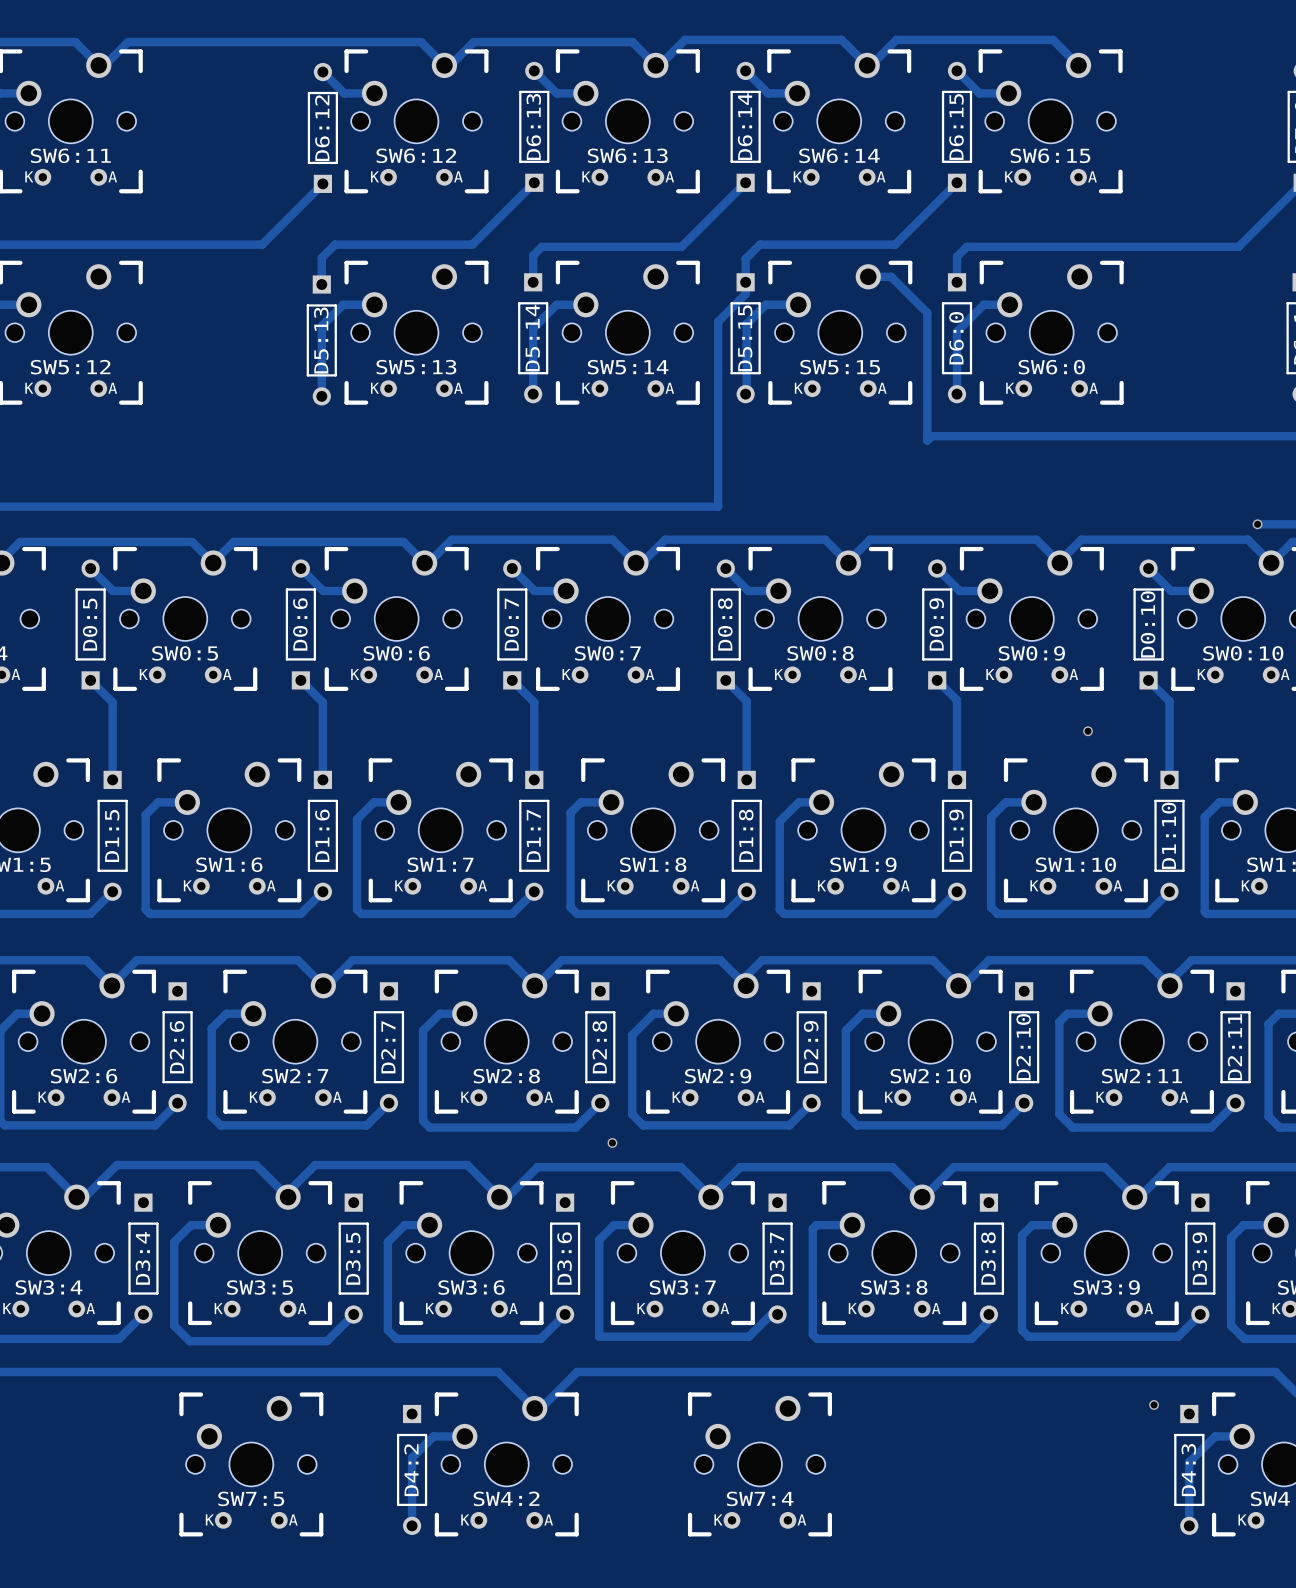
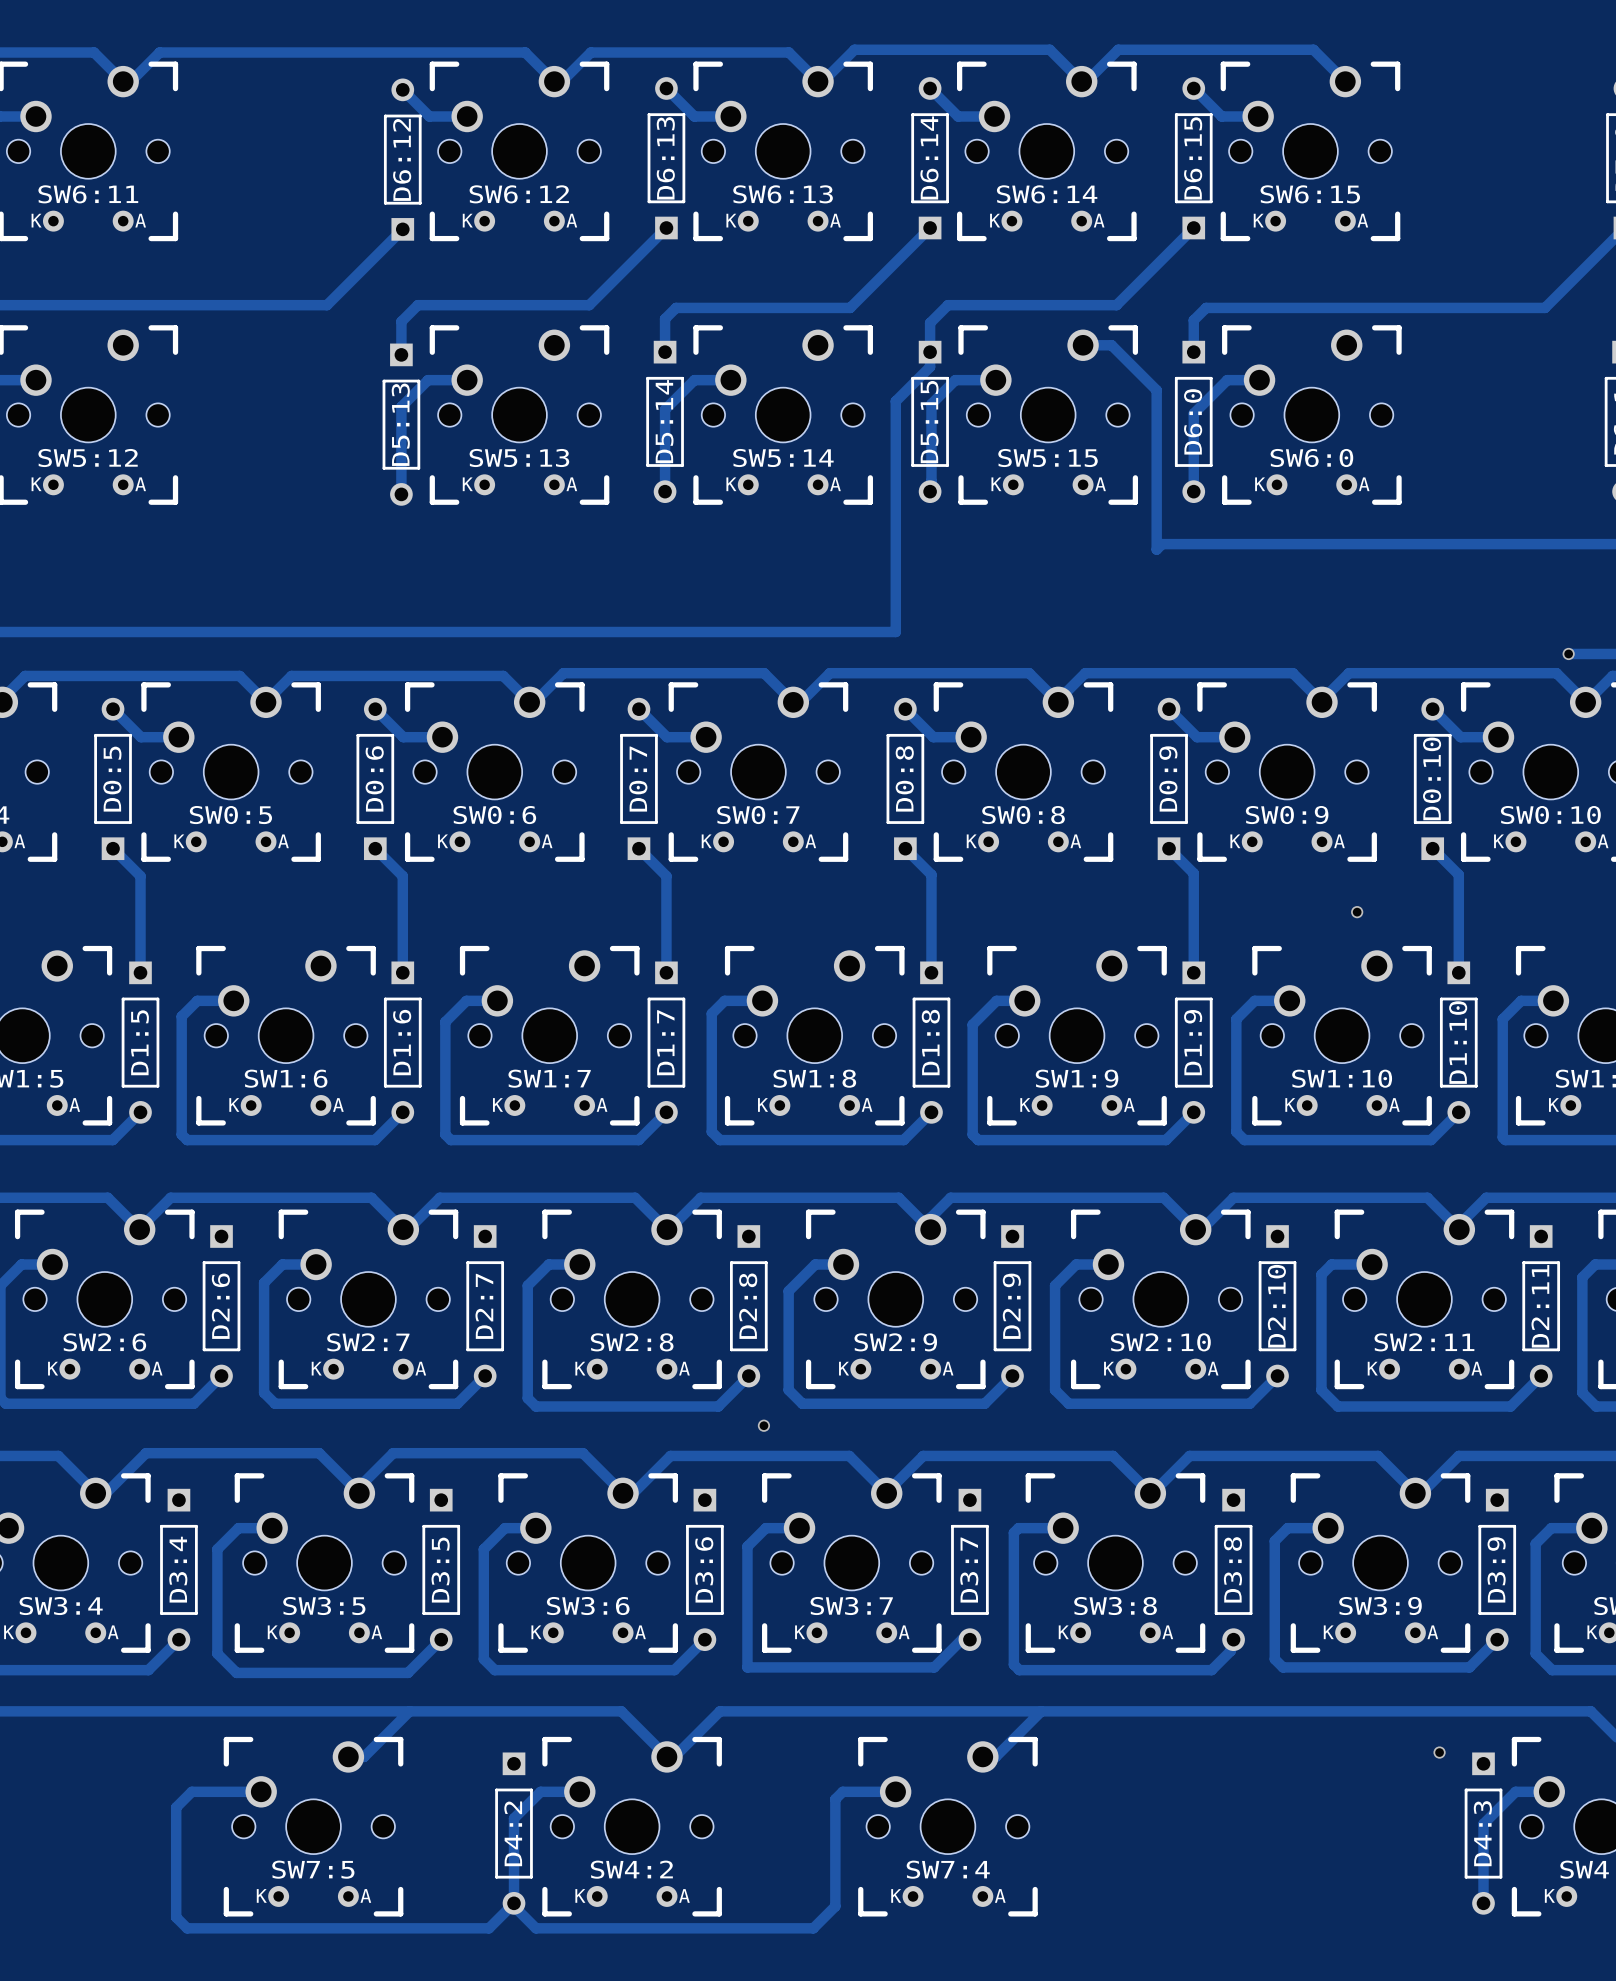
track: none -> (409, 1711) (364, 1756) (348, 1756)
track: none -> (1041, 1711) (995, 1756) (982, 1756)
track: none -> (261, 1791) (191, 1791) (176, 1807) (176, 1917) (187, 1928) (489, 1928) (514, 1903) (514, 1906) (535, 1928) (813, 1928) (835, 1906) (835, 1799) (842, 1791) (895, 1791)

